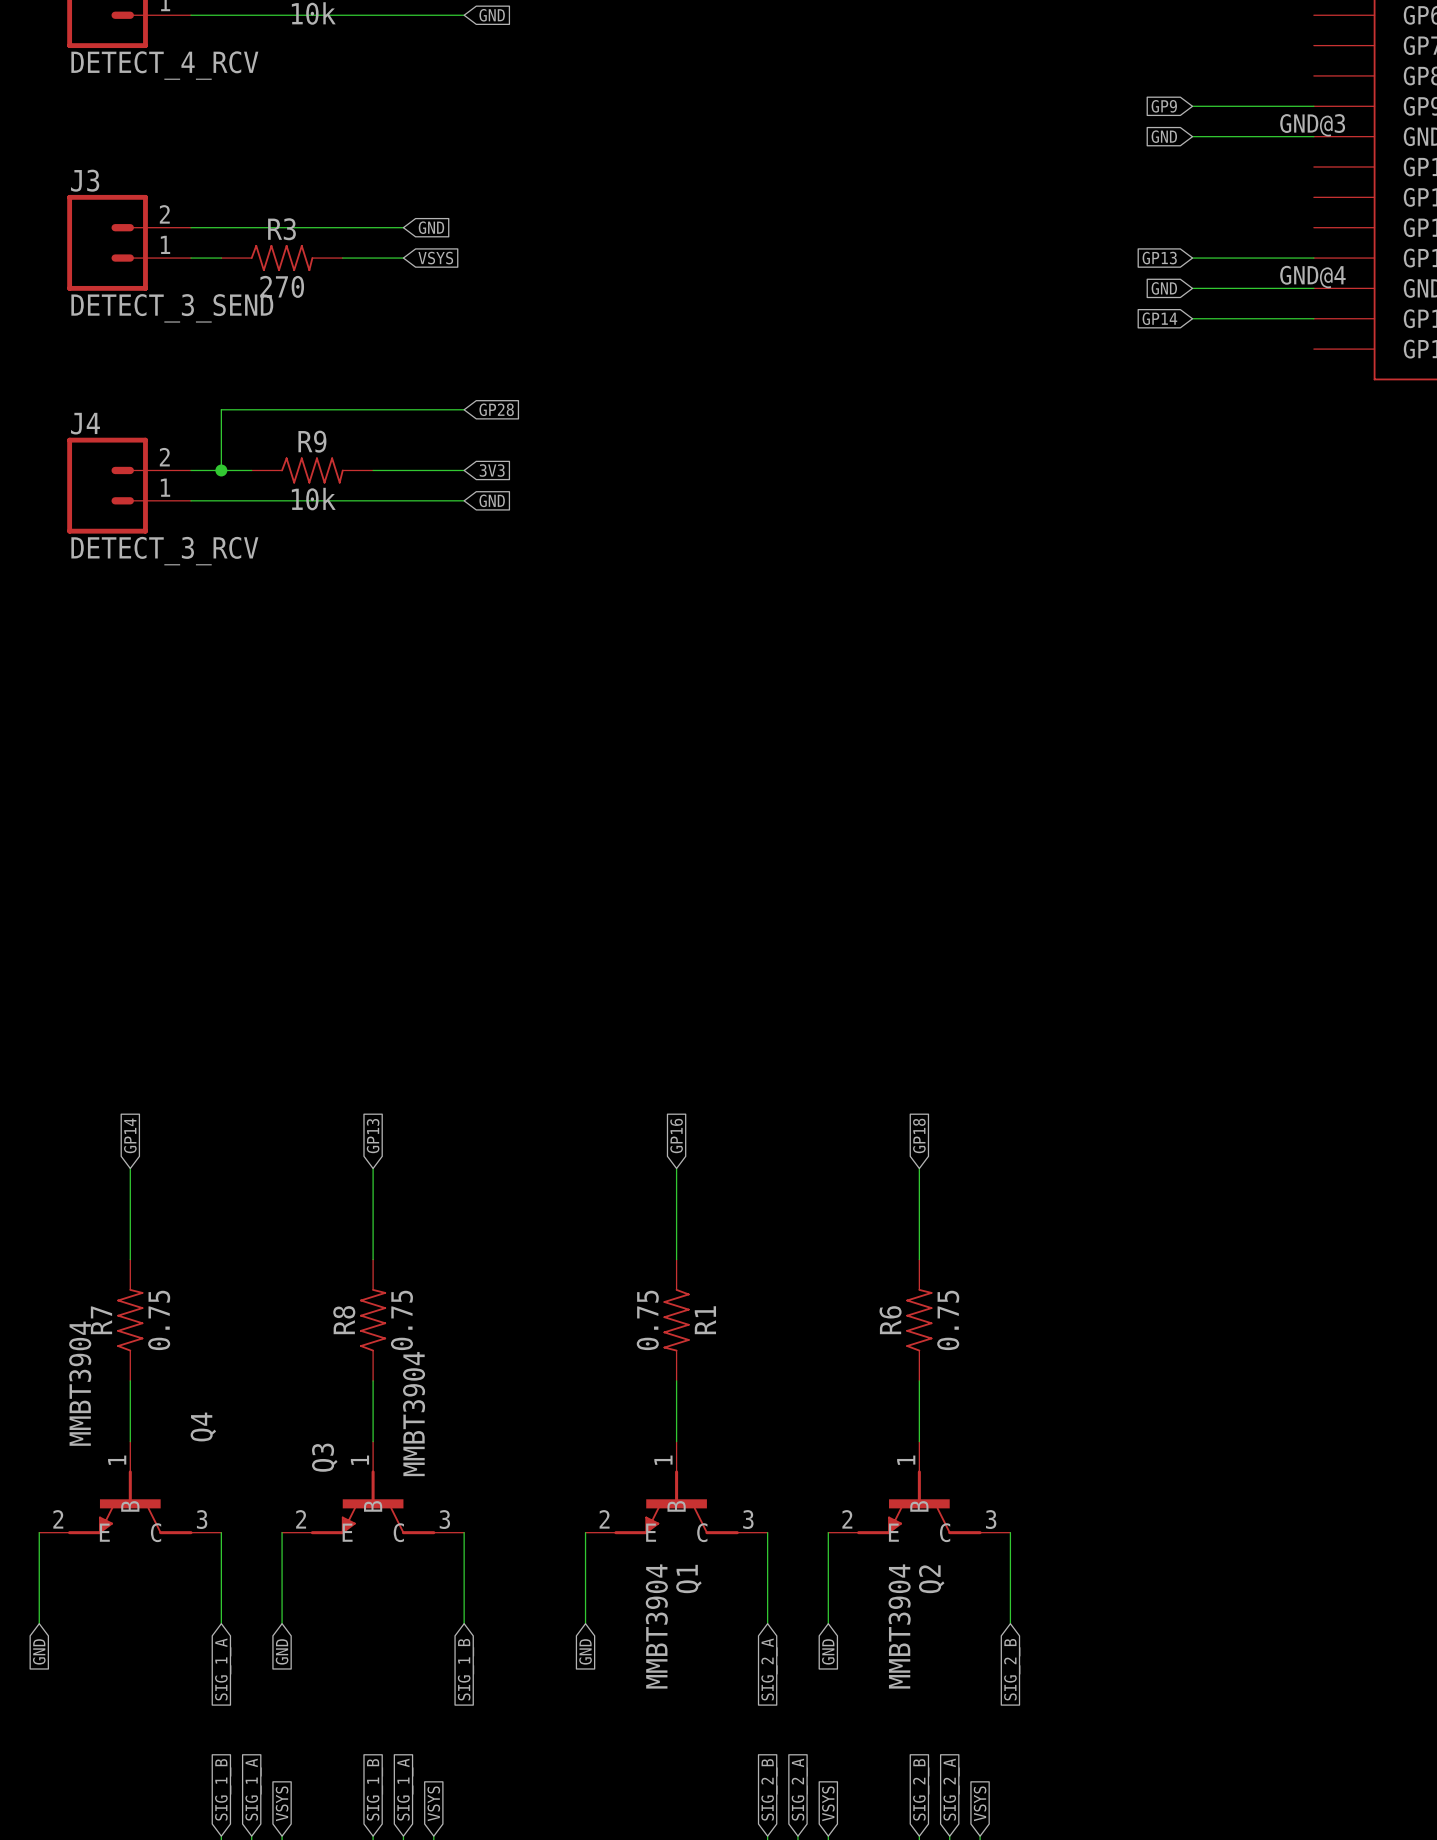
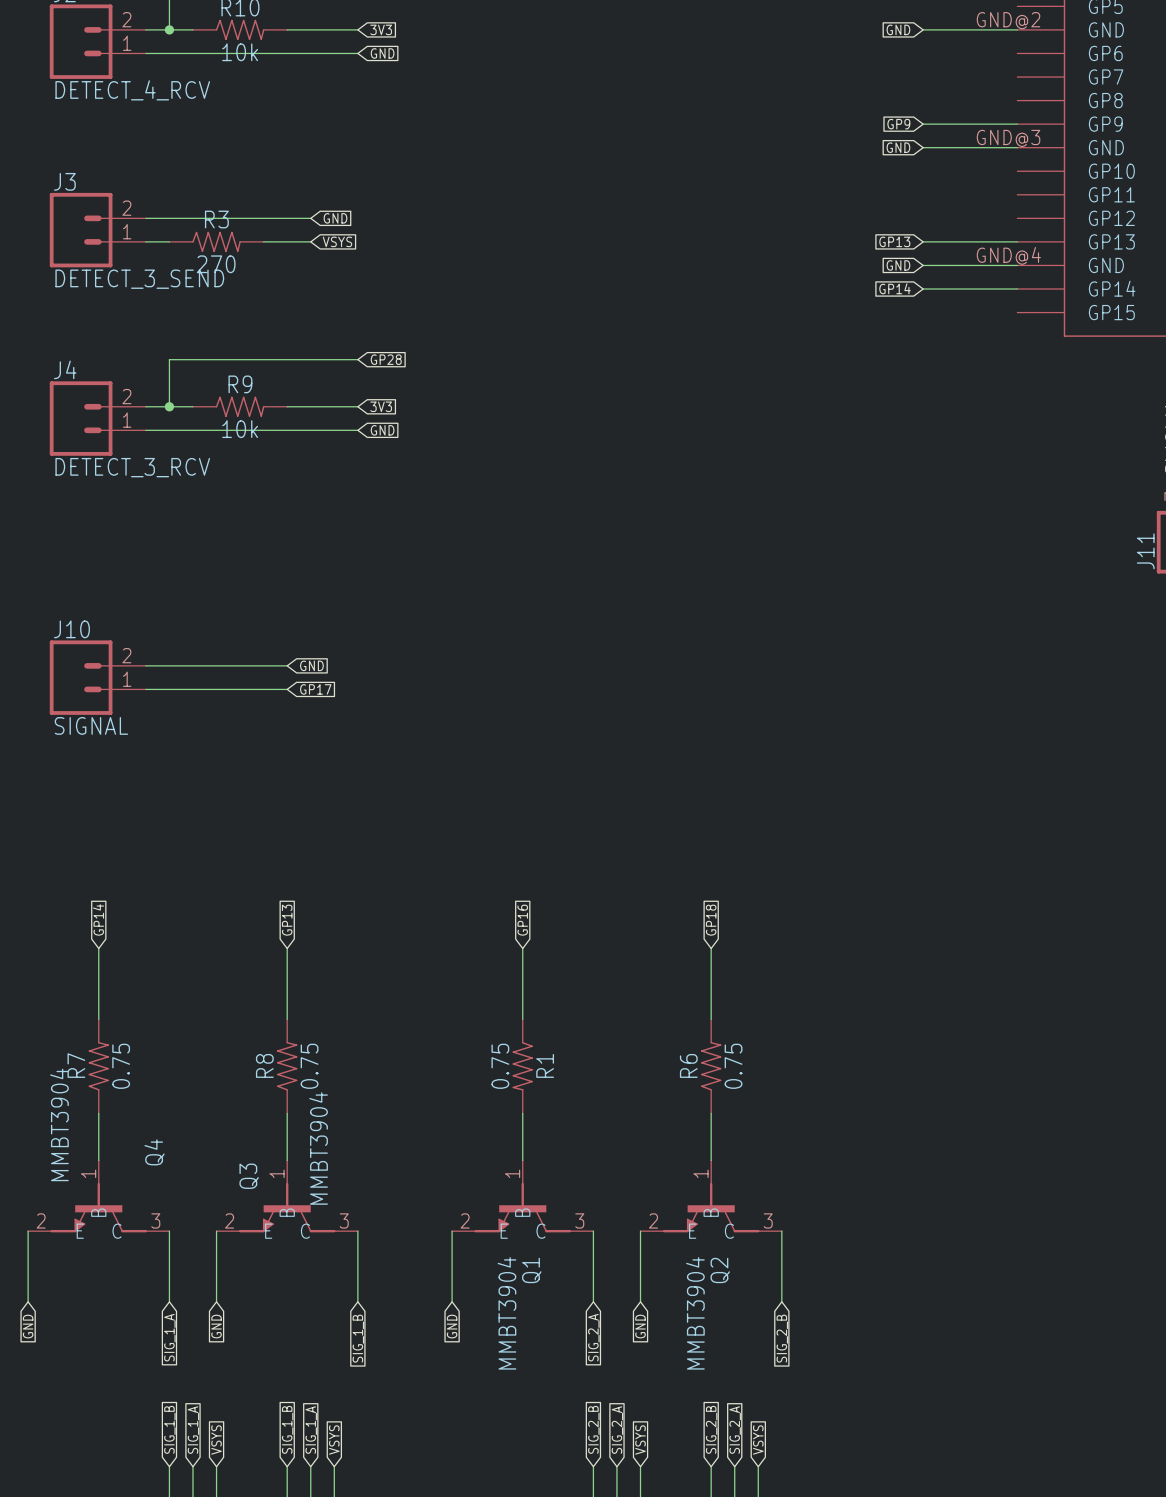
wire: none -> (145, 665) (287, 665)
global label: none -> GND (311, 665)
J10: none -> SIGNAL (97, 677)
wire: none -> (145, 689) (287, 689)
global label: none -> GP17 (315, 689)

